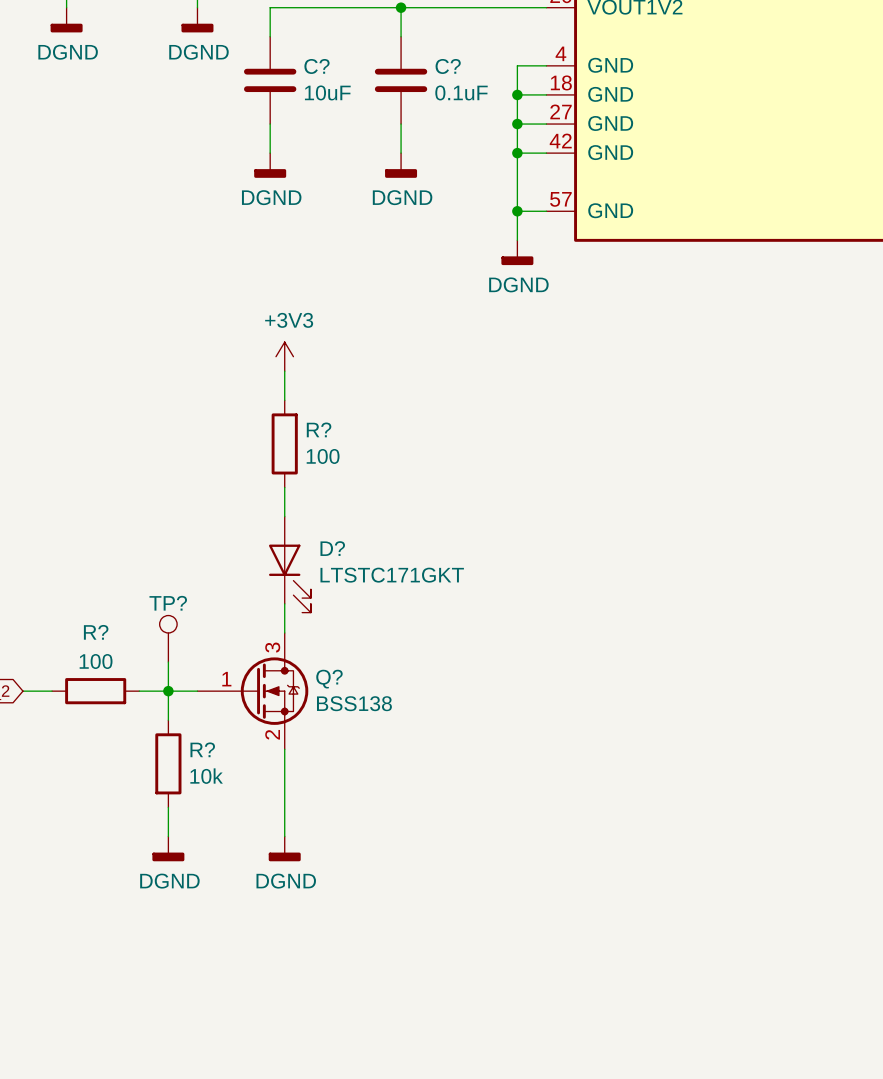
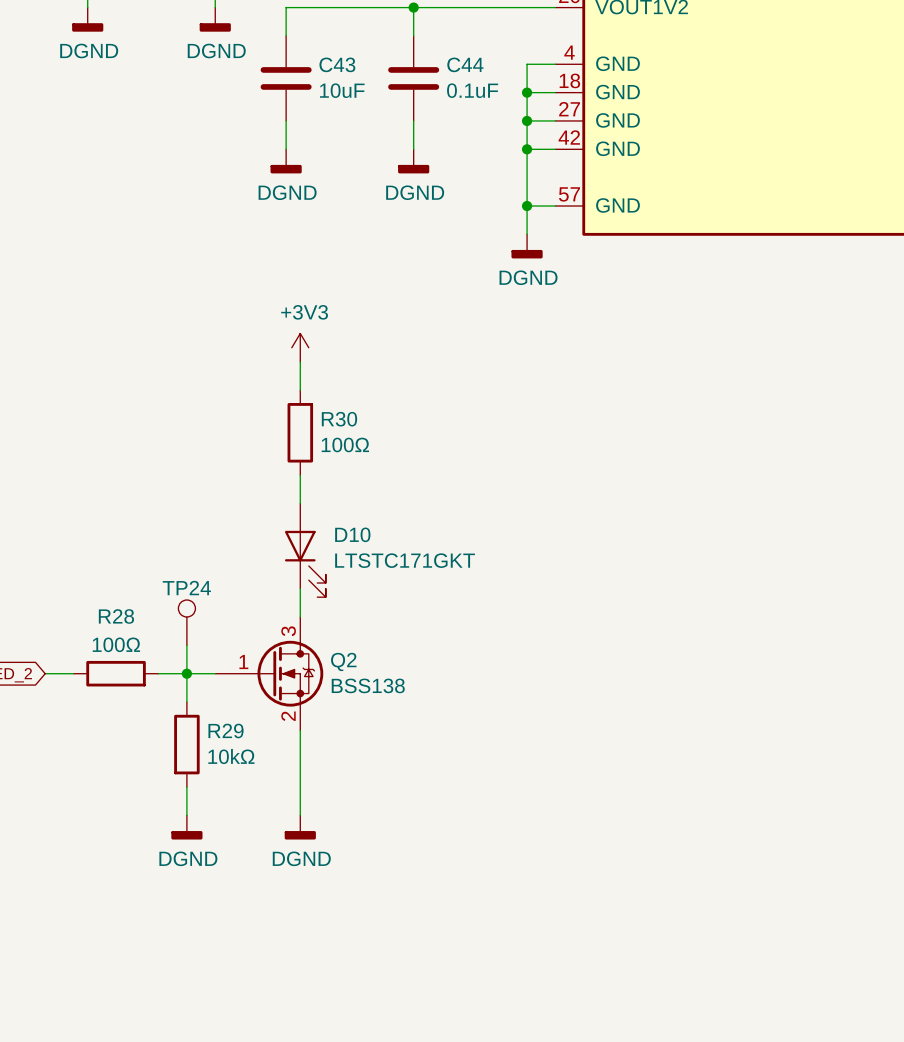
C? name: C? (316, 66) -> C43 (337, 64)
C? name: C? (448, 66) -> C44 (465, 64)
R? name: R? (319, 429) -> R30 (339, 419)
R? value: 100 (323, 456) -> 100Ω (345, 444)
D? name: D? (332, 548) -> D10 (352, 534)
TP? name: TP? (168, 603) -> TP24 (186, 588)
R? name: R? (96, 632) -> R28 (116, 616)
R? value: 100 (96, 661) -> 100Ω (116, 644)
Q? name: Q? (329, 679) -> Q2 (343, 661)
R? name: R? (202, 749) -> R29 (226, 730)
R? value: 10k (206, 776) -> 10kΩ (231, 756)

